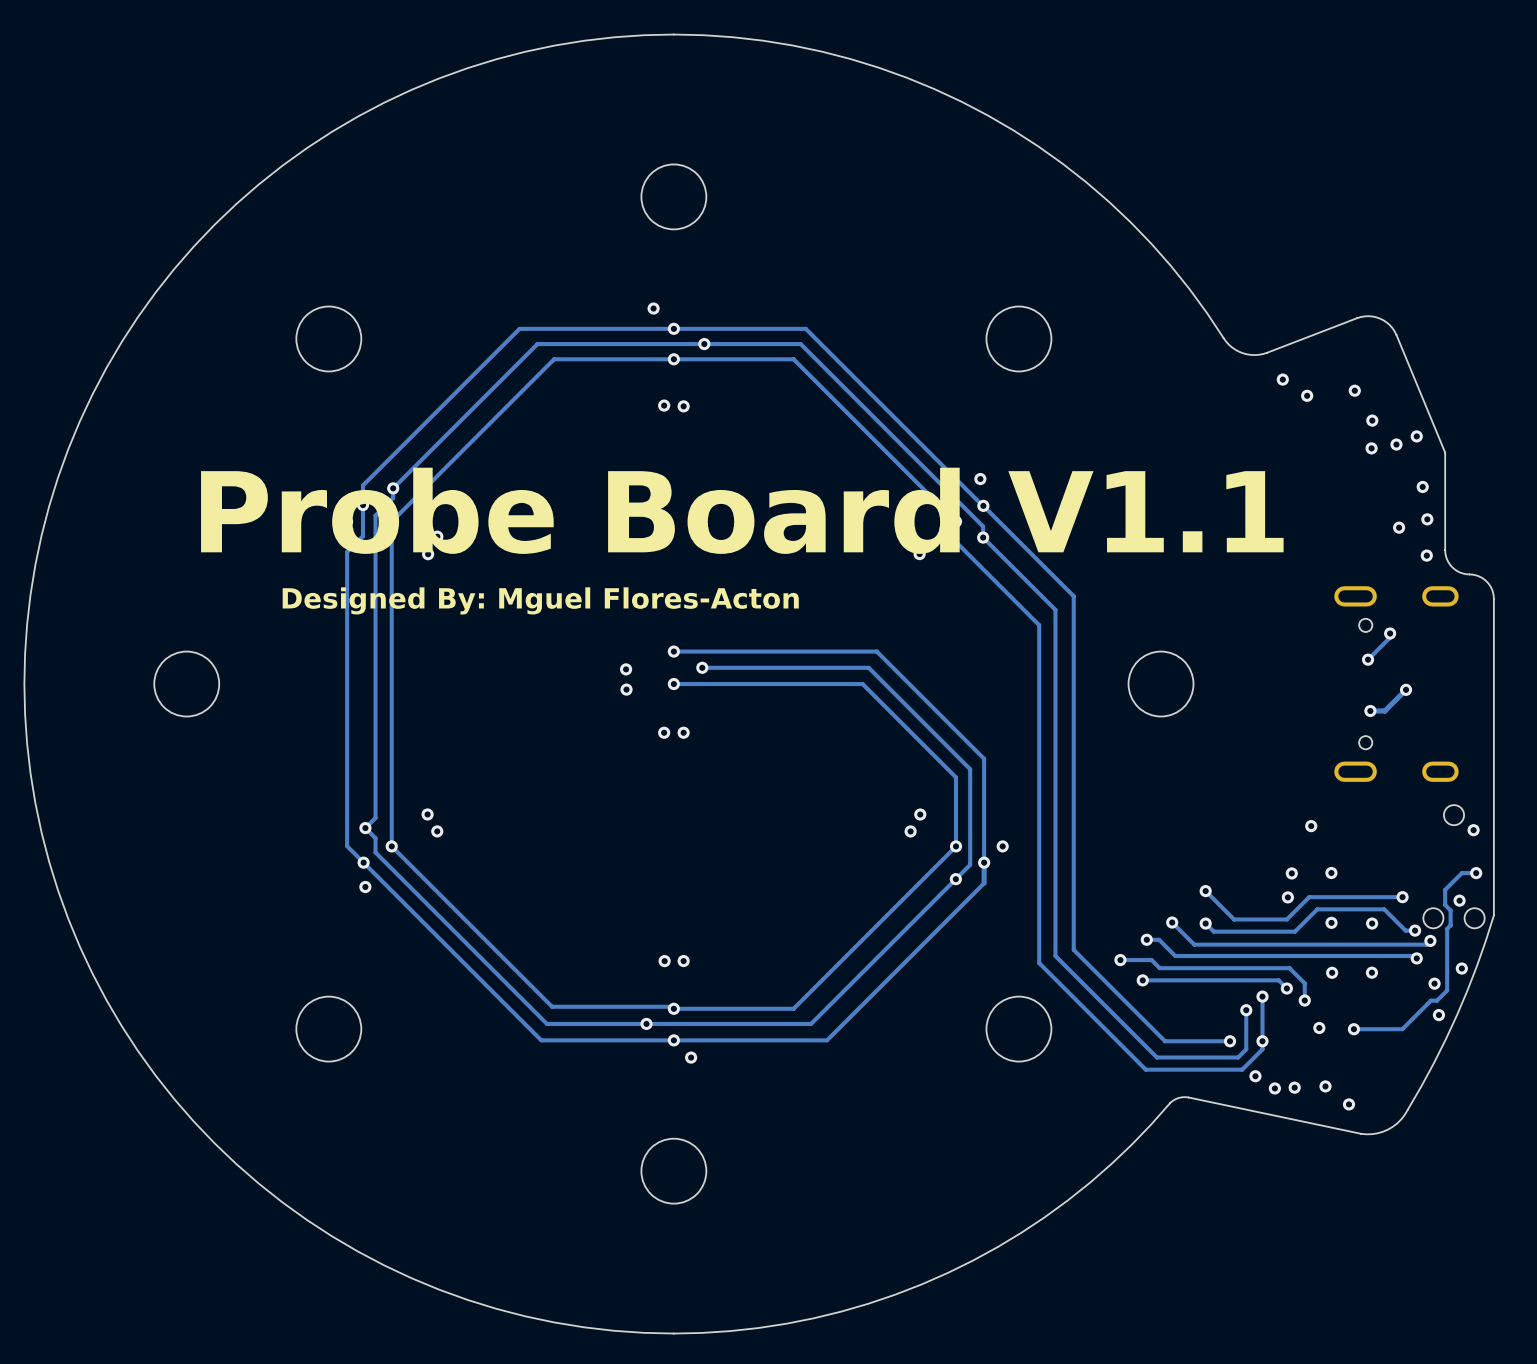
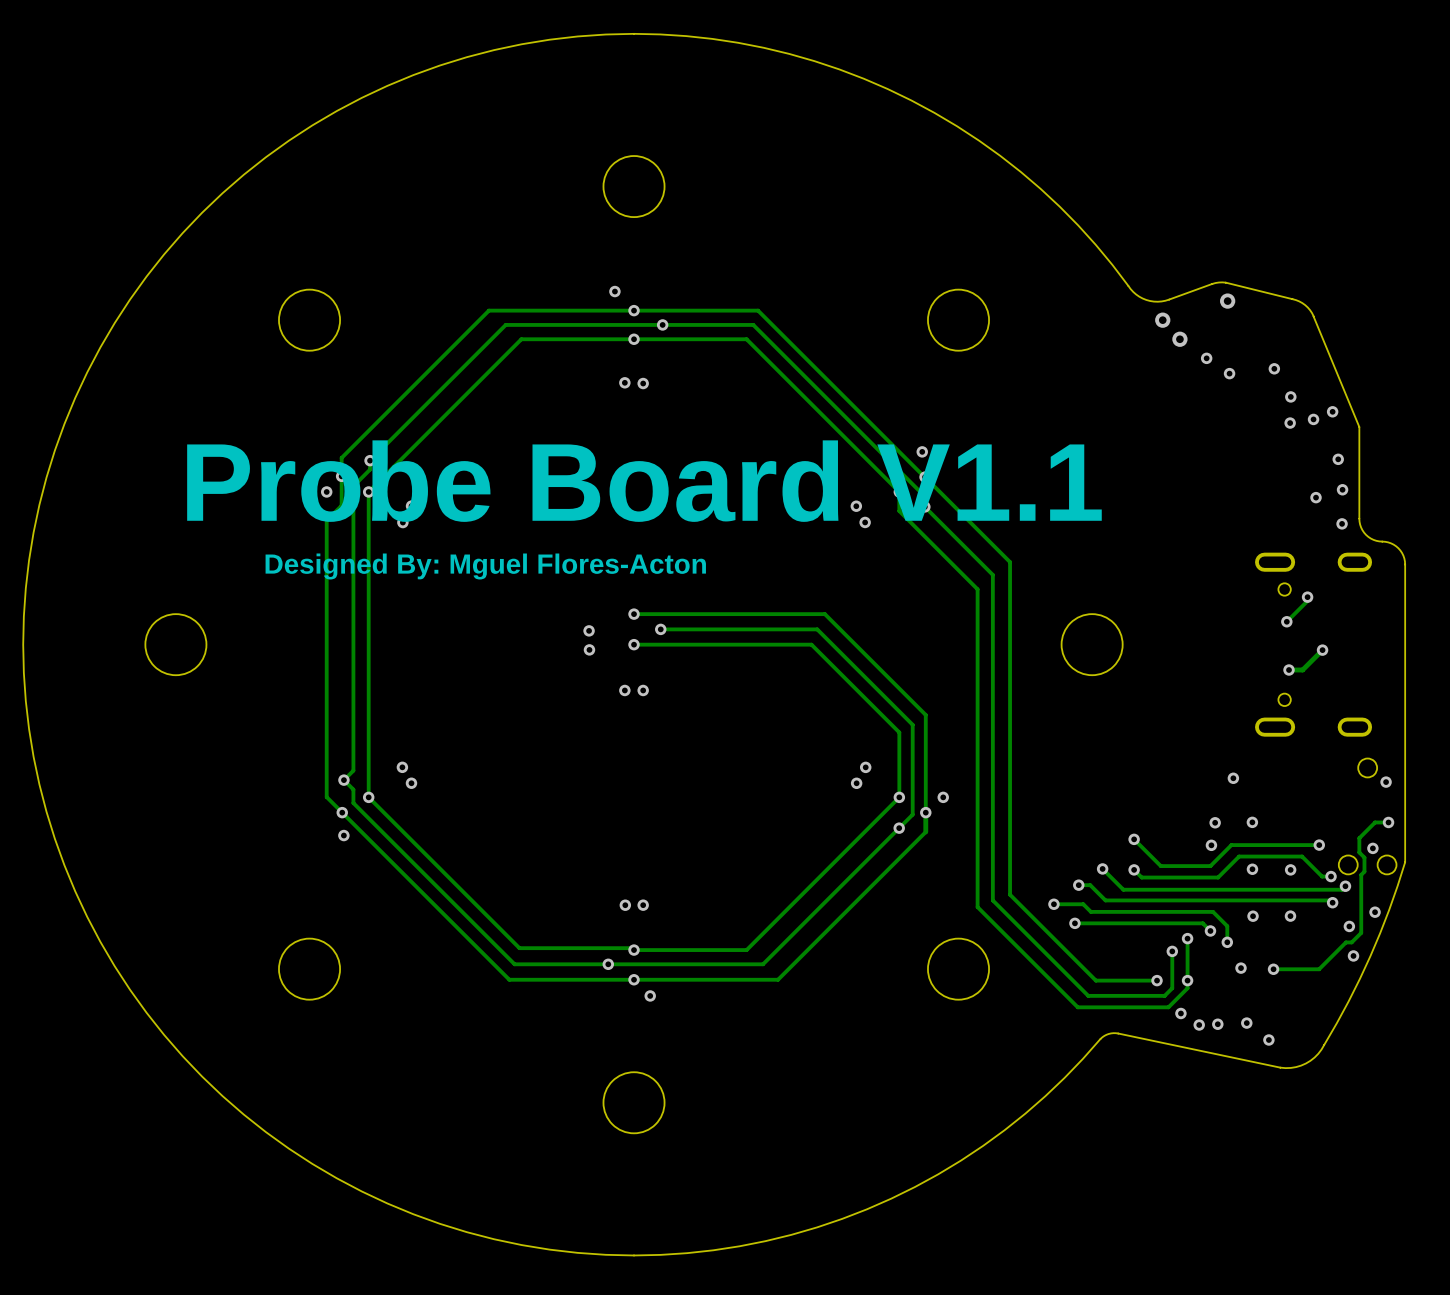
board edge: (673, 34) (762, 40) (850, 58) (934, 89) (987, 115) (1062, 163) (1108, 201) (1171, 266) (1226, 341) (1238, 351) (1250, 354) (1263, 353) (1364, 316) (1383, 320) (1396, 334) -> (634, 33) (712, 38) (789, 53) (839, 69) (911, 100) (978, 140) (1040, 188) (1078, 225) (1130, 289) (1142, 298) (1153, 301) (1165, 300) (1212, 283) (1225, 282) (1295, 300) (1305, 305) (1313, 316)
via: none -> (1227, 301)
via: none -> (1162, 320)
via: none -> (1179, 339)

